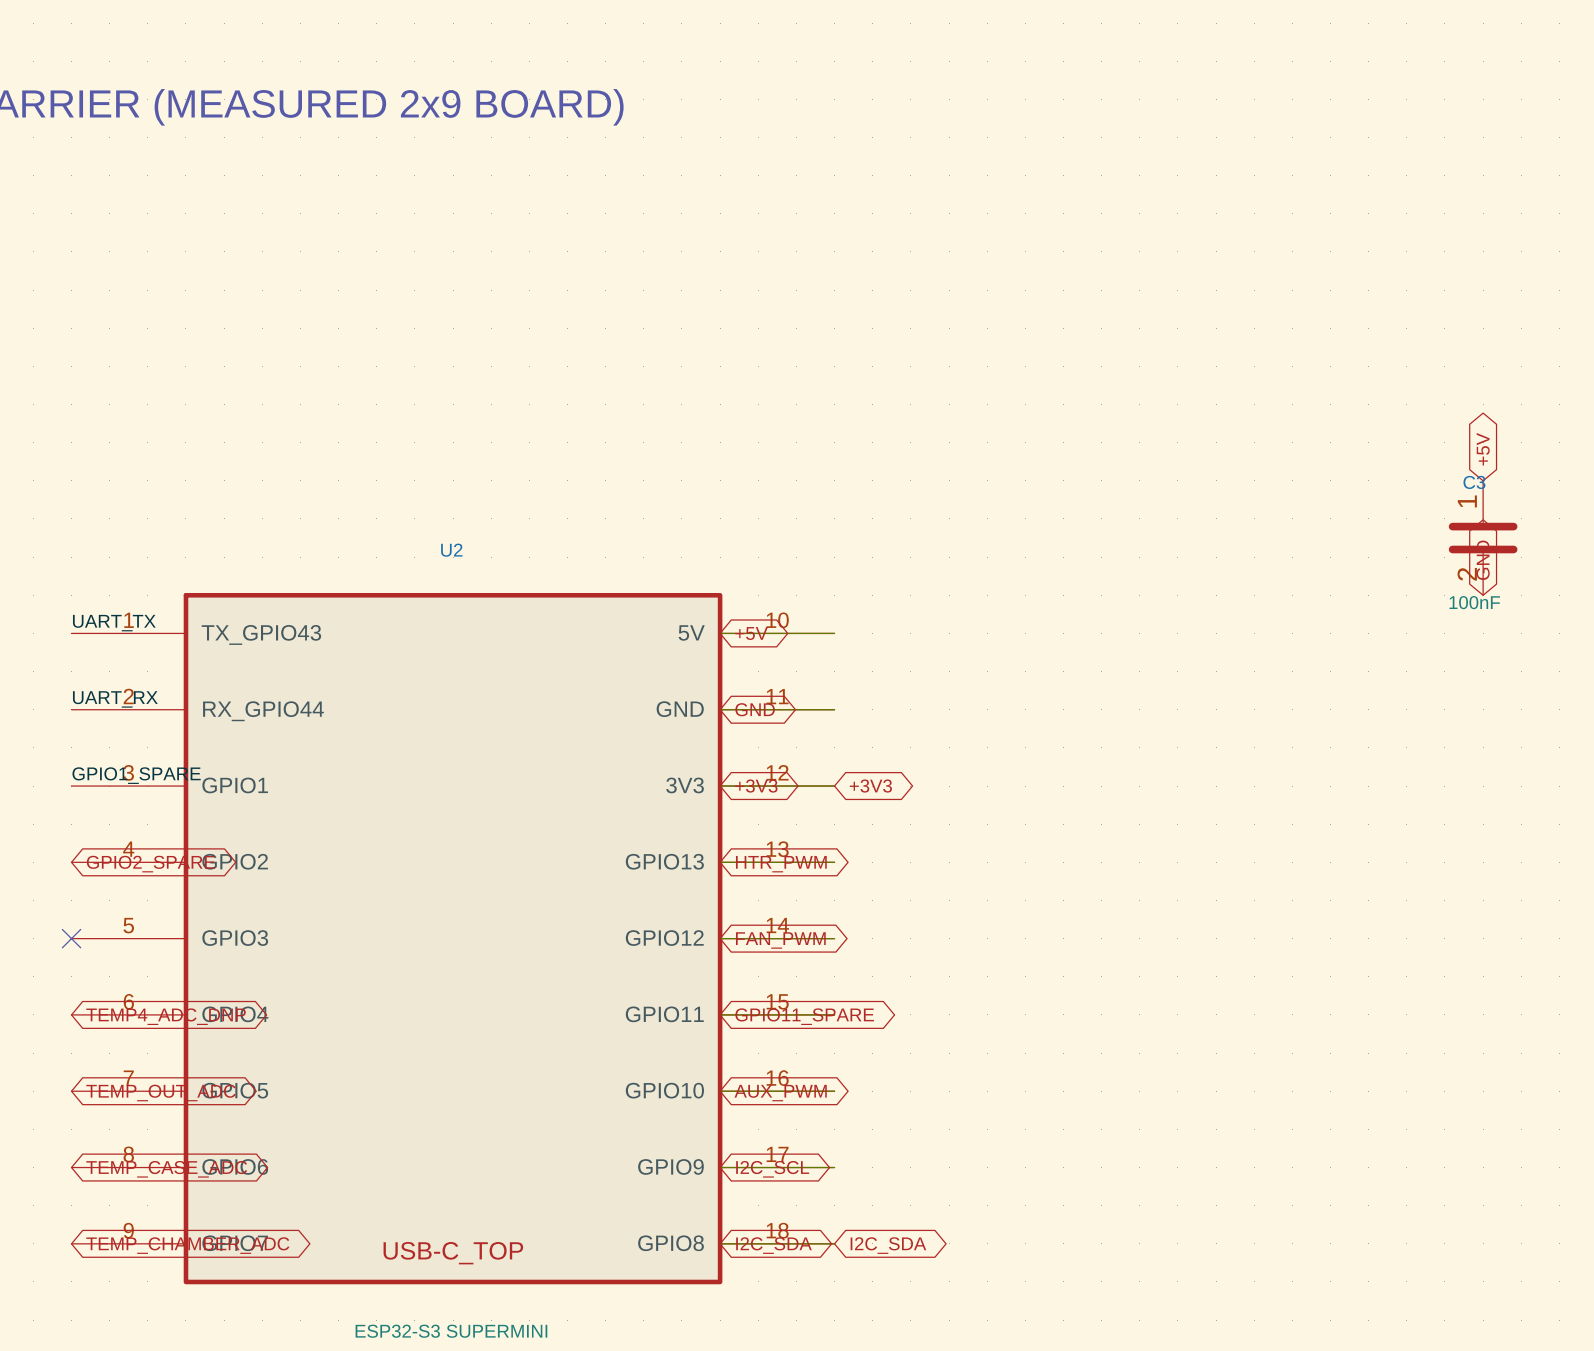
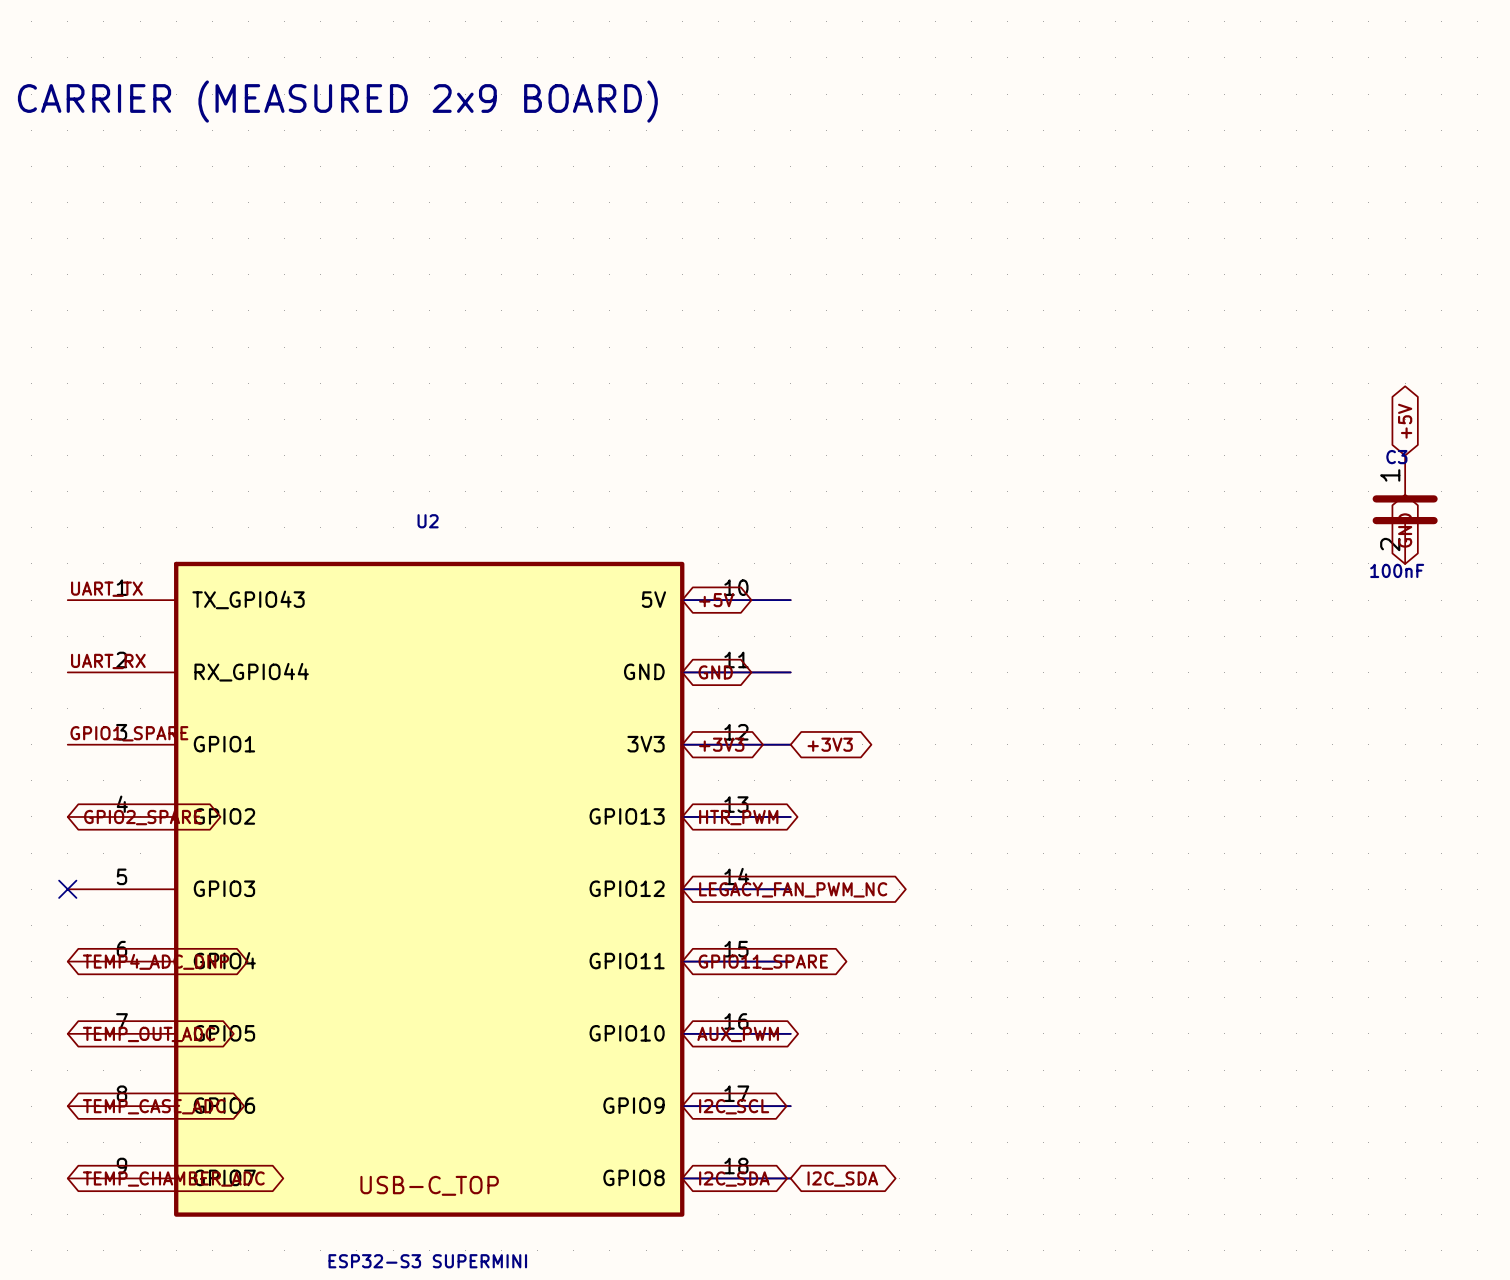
global label: FAN_PWM (780, 940) -> LEGACY_FAN_PWM_NC (793, 889)

